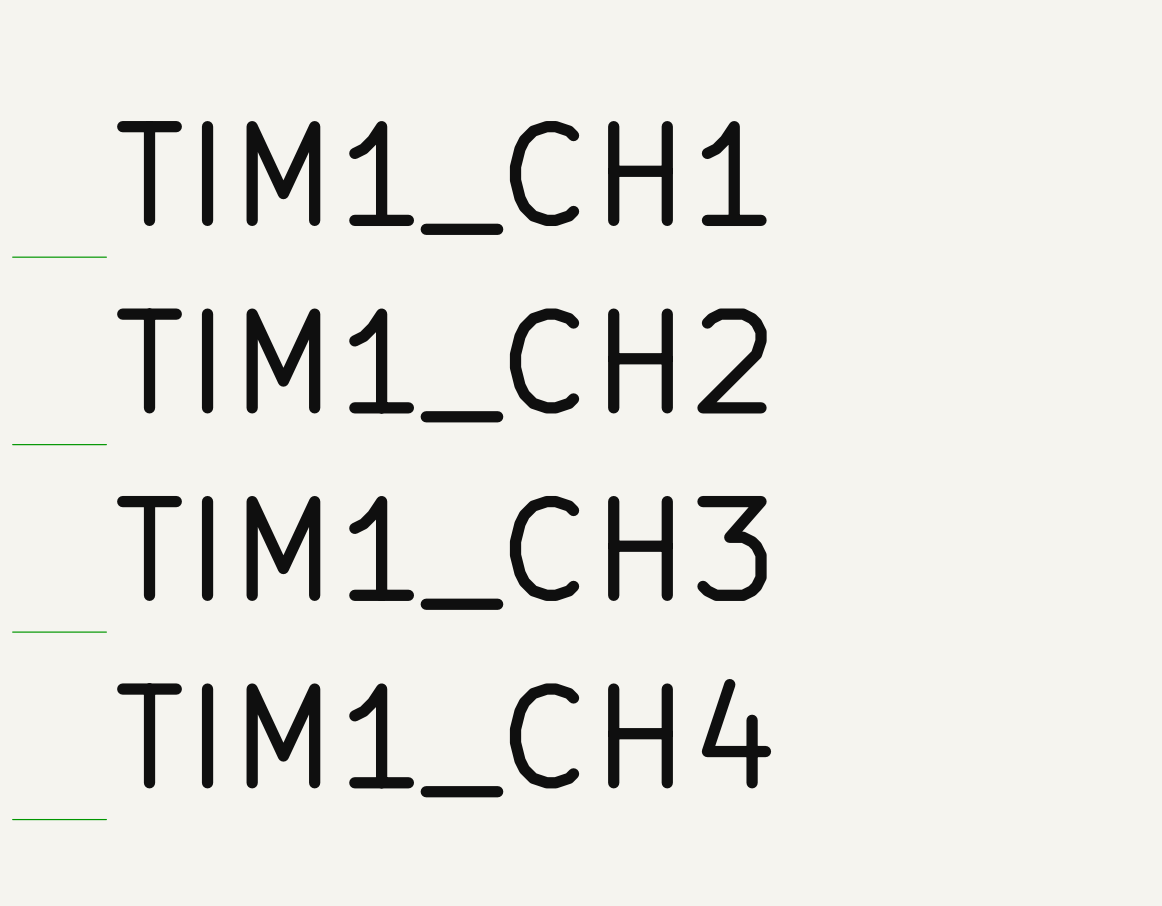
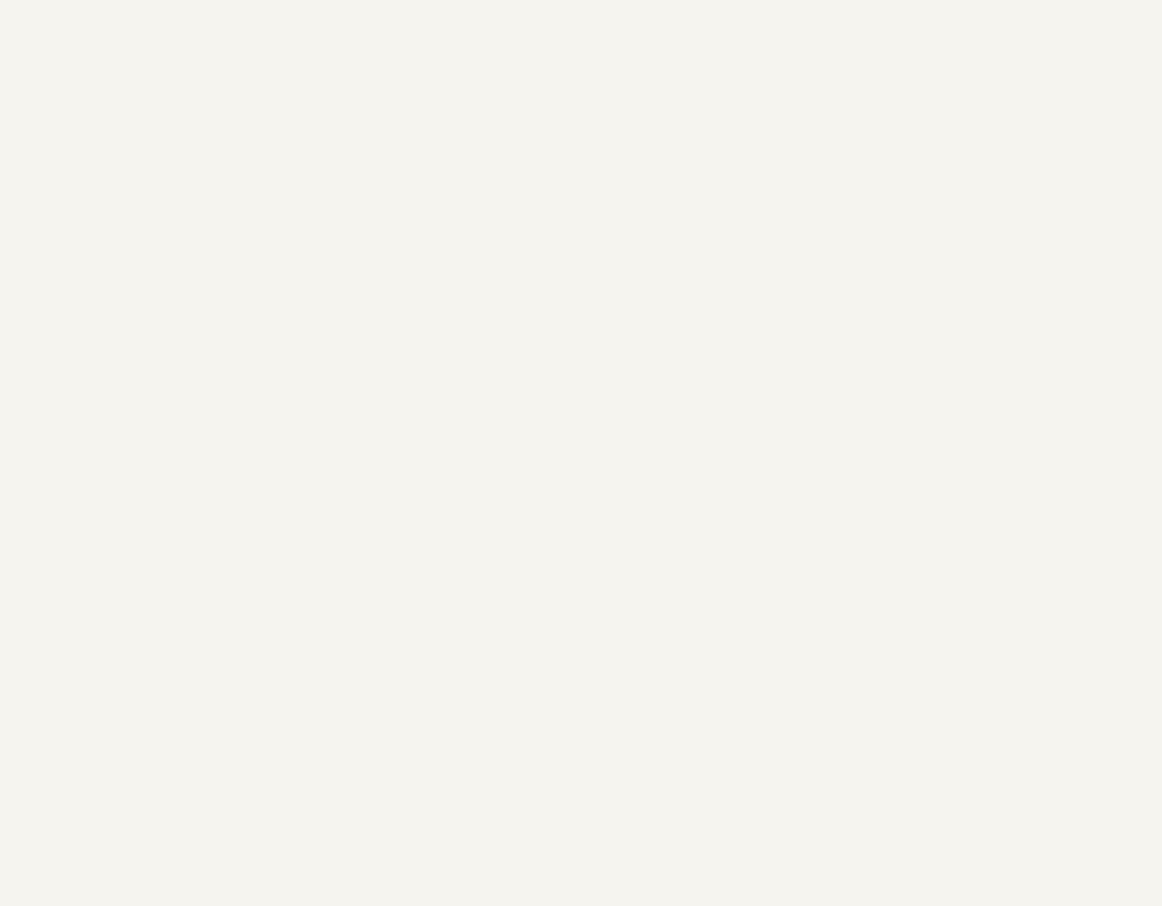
label: TIM1_CH1 (441, 177) -> none
wire: (12, 257) (106, 257) -> none
label: TIM1_CH2 (441, 365) -> none
wire: (12, 444) (106, 444) -> none
label: TIM1_CH3 (441, 552) -> none
wire: (12, 632) (106, 632) -> none
label: TIM1_CH4 (444, 738) -> none
wire: (12, 819) (106, 819) -> none

